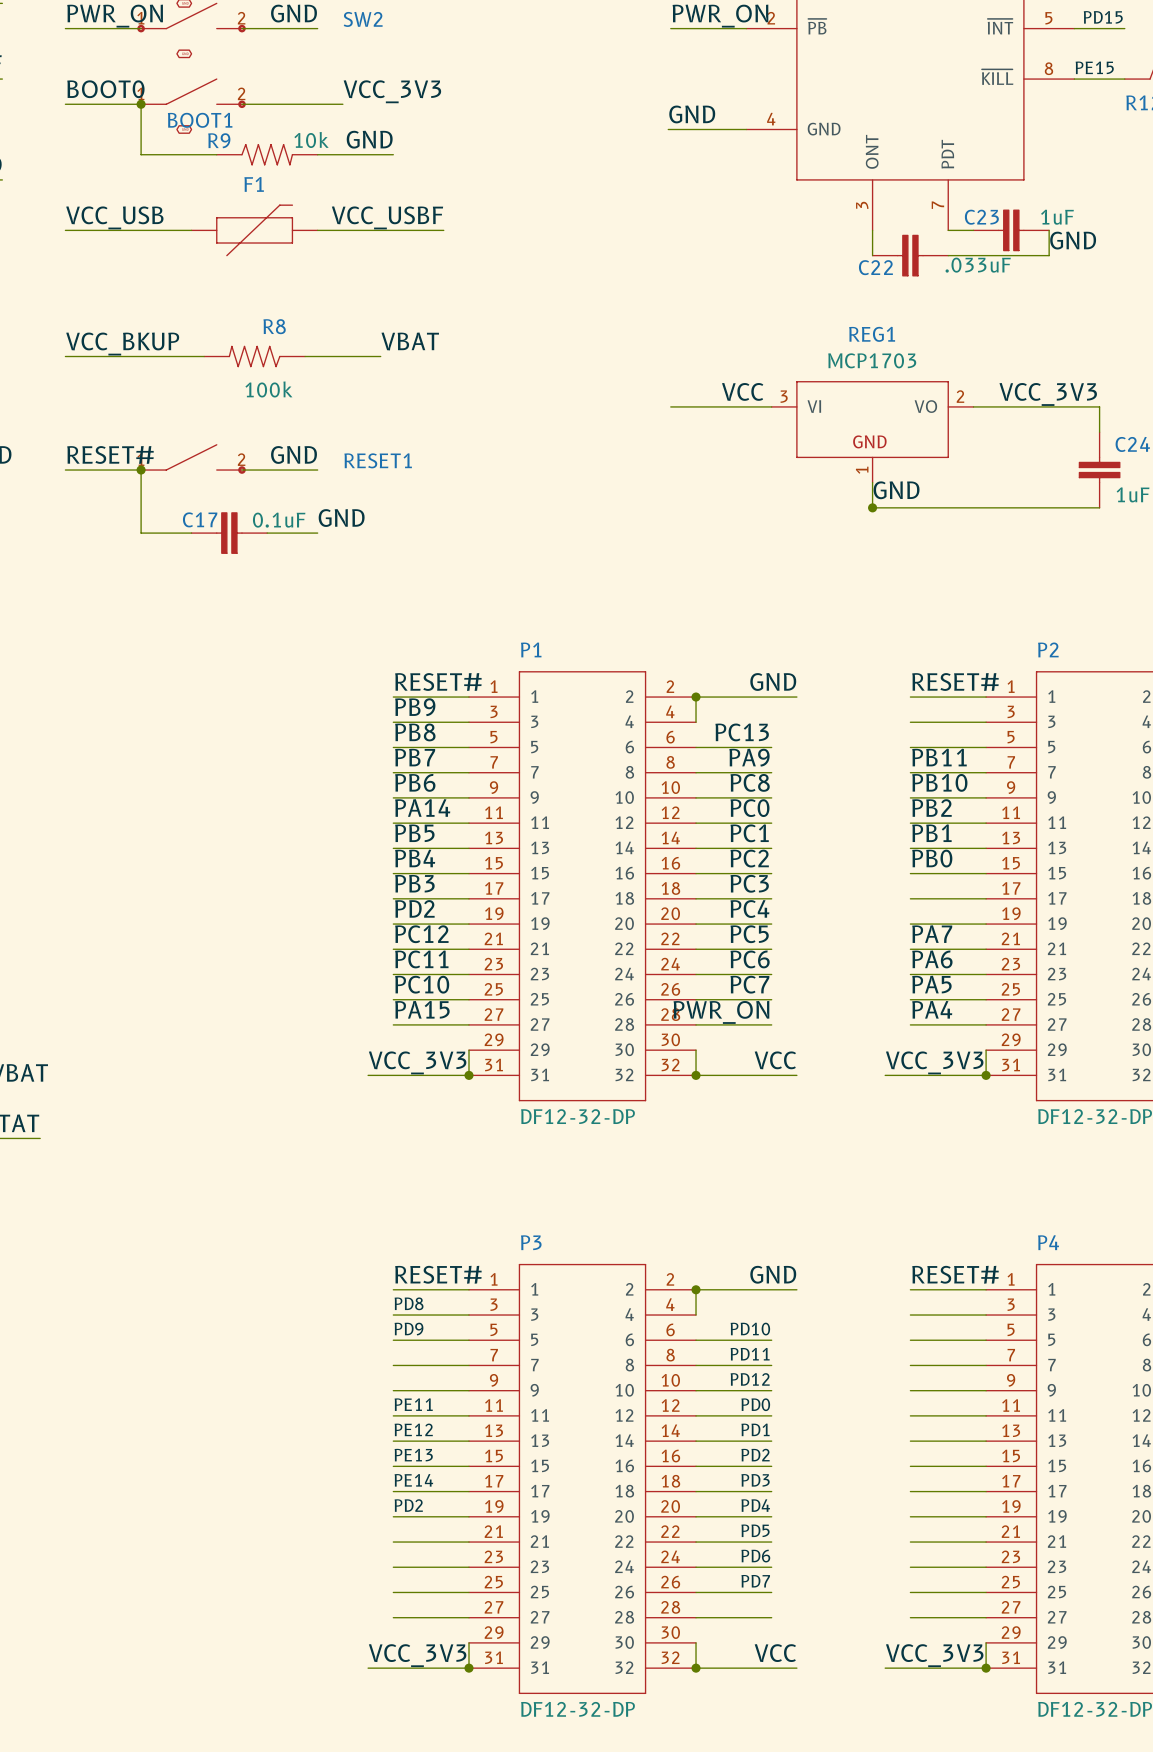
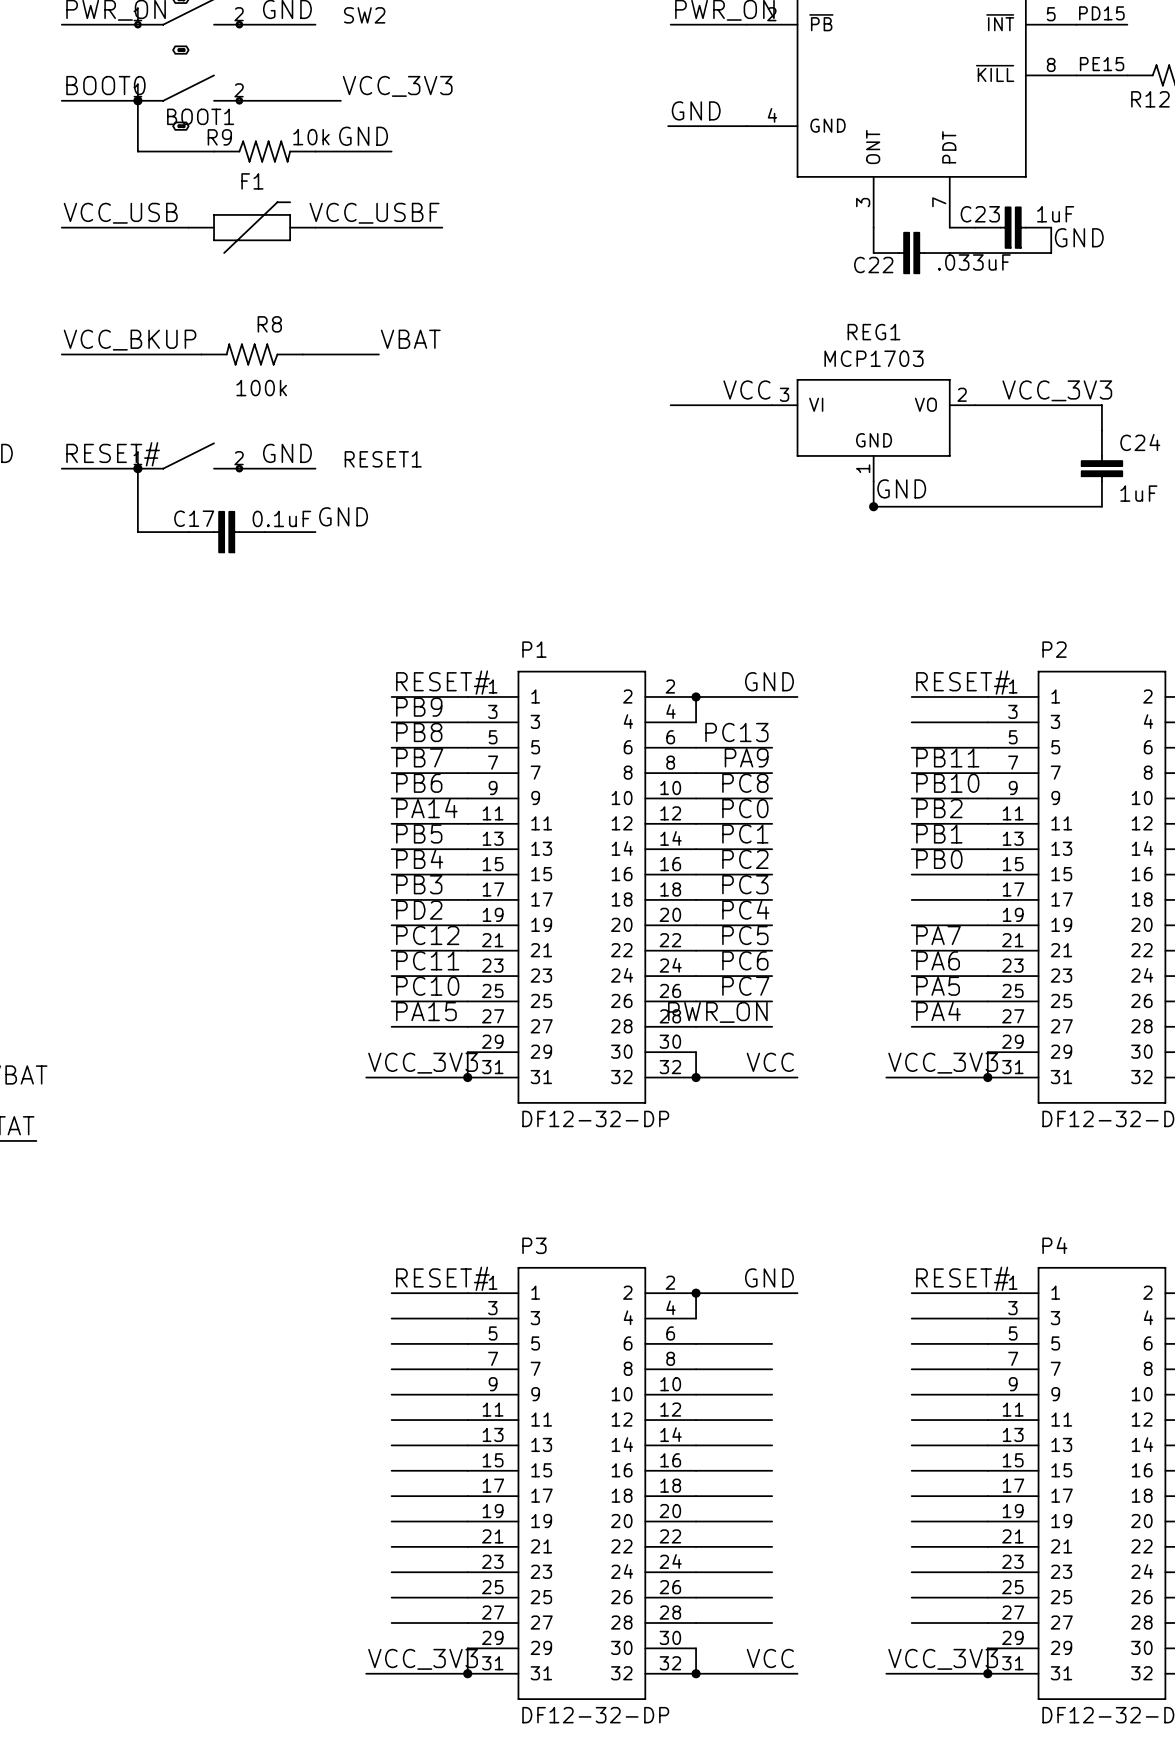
label: PD8 (409, 1303) -> none
label: PD9 (408, 1329) -> none
label: PD10 (750, 1329) -> none
label: PD11 (750, 1354) -> none
label: PD12 (750, 1379) -> none
label: PE11 (413, 1404) -> none
label: PD0 (755, 1404) -> none
label: PE12 (413, 1429) -> none
label: PD1 (755, 1429) -> none
label: PE13 (413, 1455) -> none
label: PD2 (755, 1455) -> none
label: PE14 (413, 1480) -> none
label: PD3 (755, 1480) -> none
label: PD2 (408, 1505) -> none
label: PD4 (755, 1505) -> none
label: PD5 (755, 1530) -> none
label: PD6 (755, 1556) -> none
label: PD7 (755, 1581) -> none

